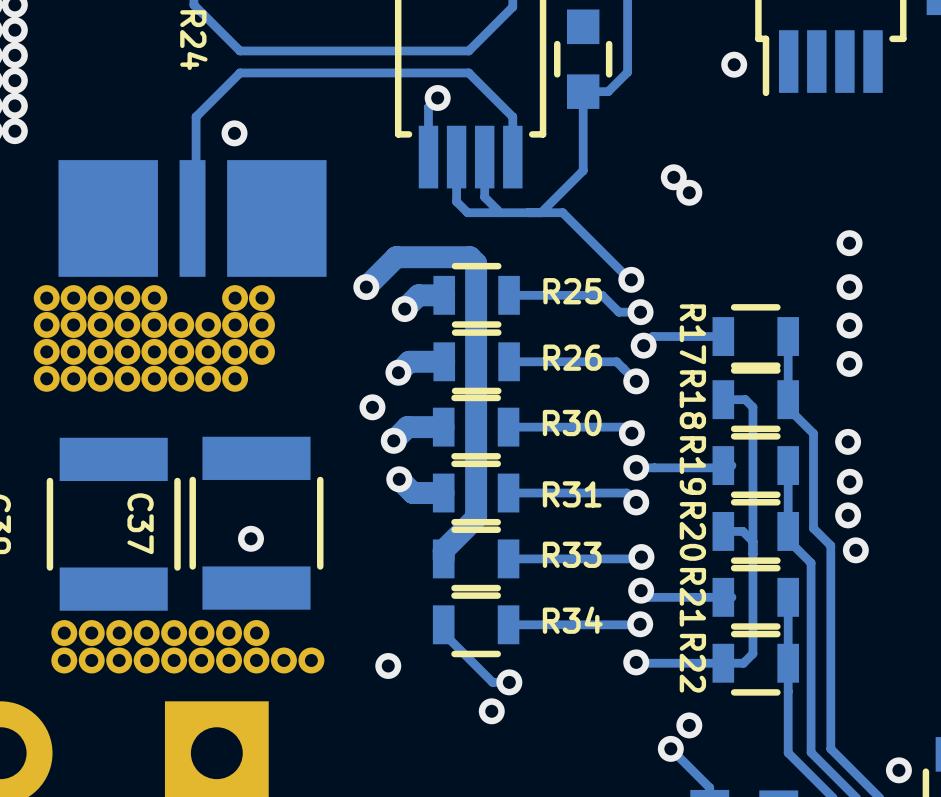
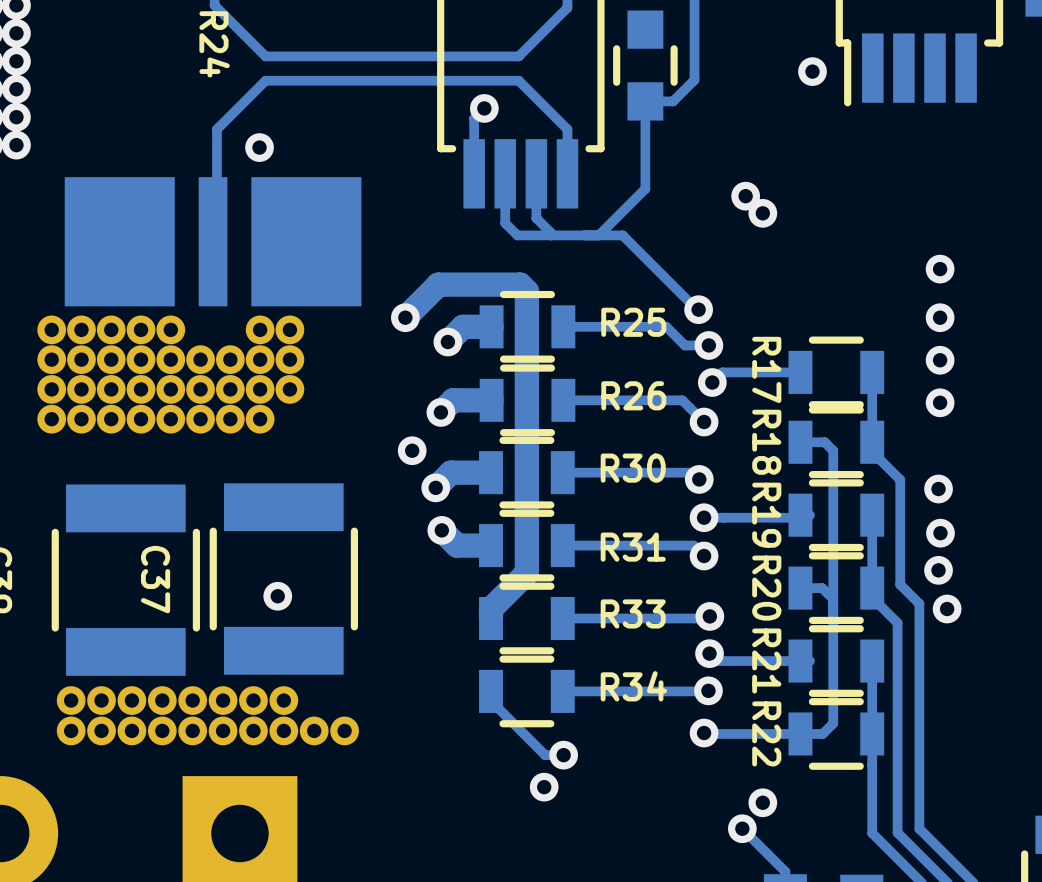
via: (388, 665) -> none
via: (898, 770) -> none

